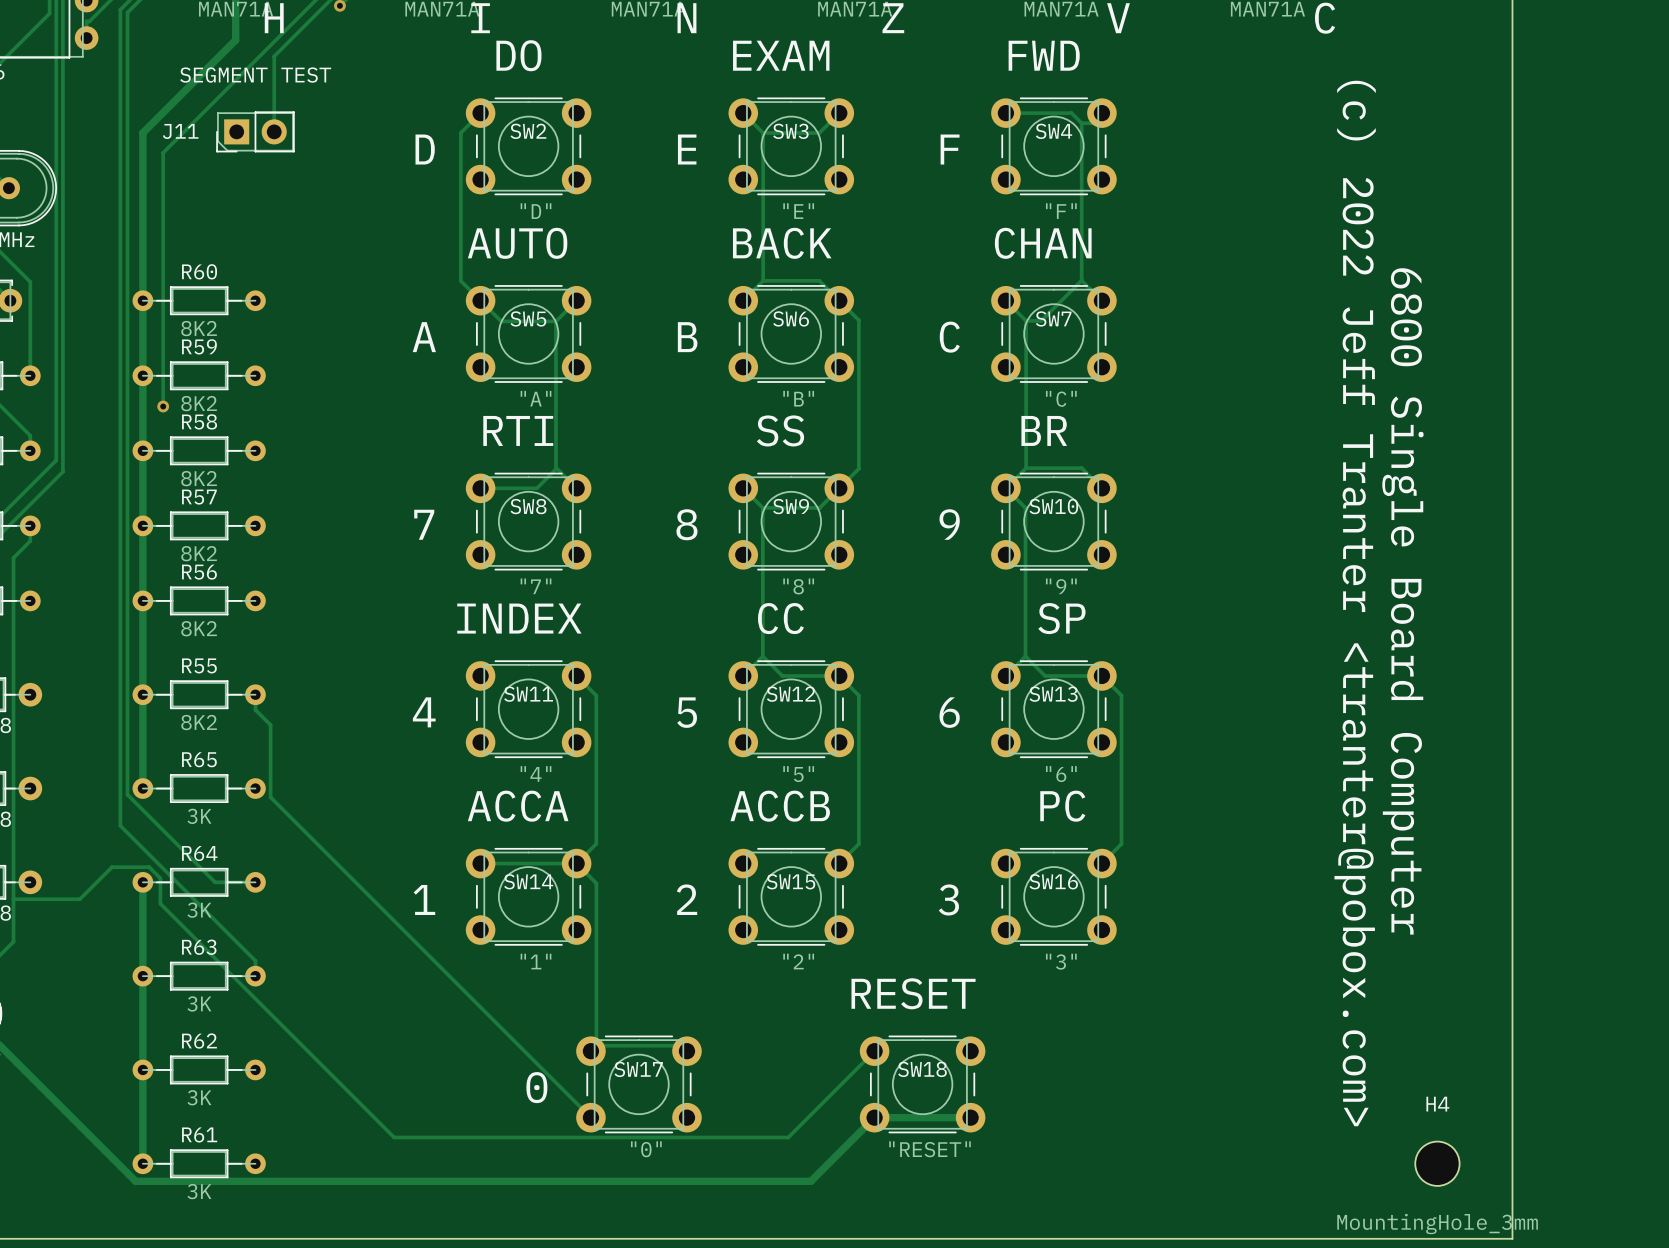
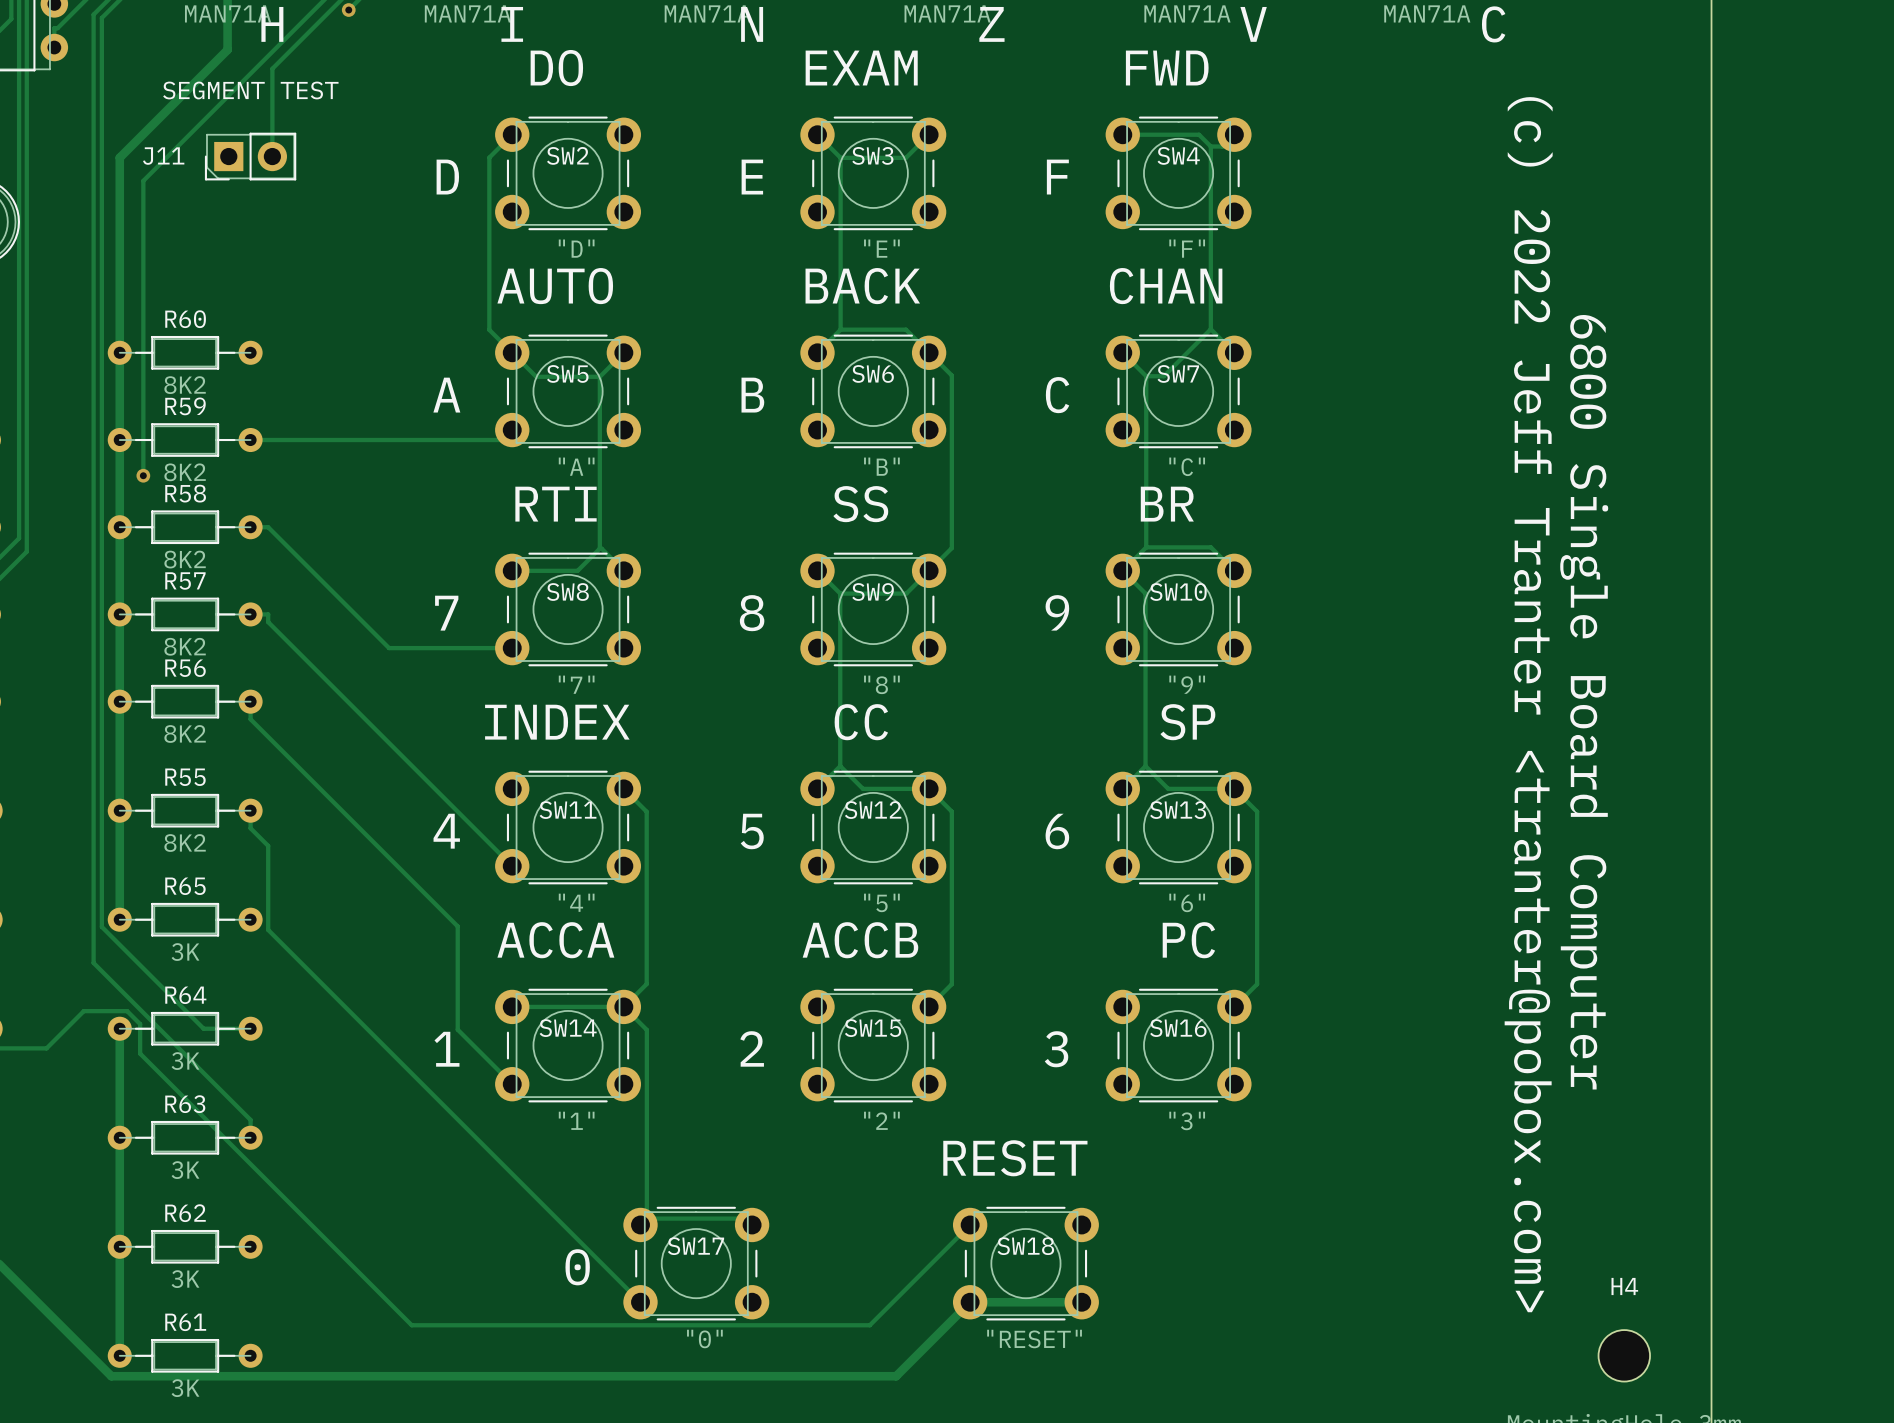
track: none -> (512, 430) (502, 440) (250, 440)
track: none -> (250, 527) (268, 527) (389, 648) (512, 648)
track: none -> (250, 614) (268, 614) (268, 622) (512, 866)
track: none -> (250, 701) (250, 719) (457, 926) (457, 1029) (512, 1084)

